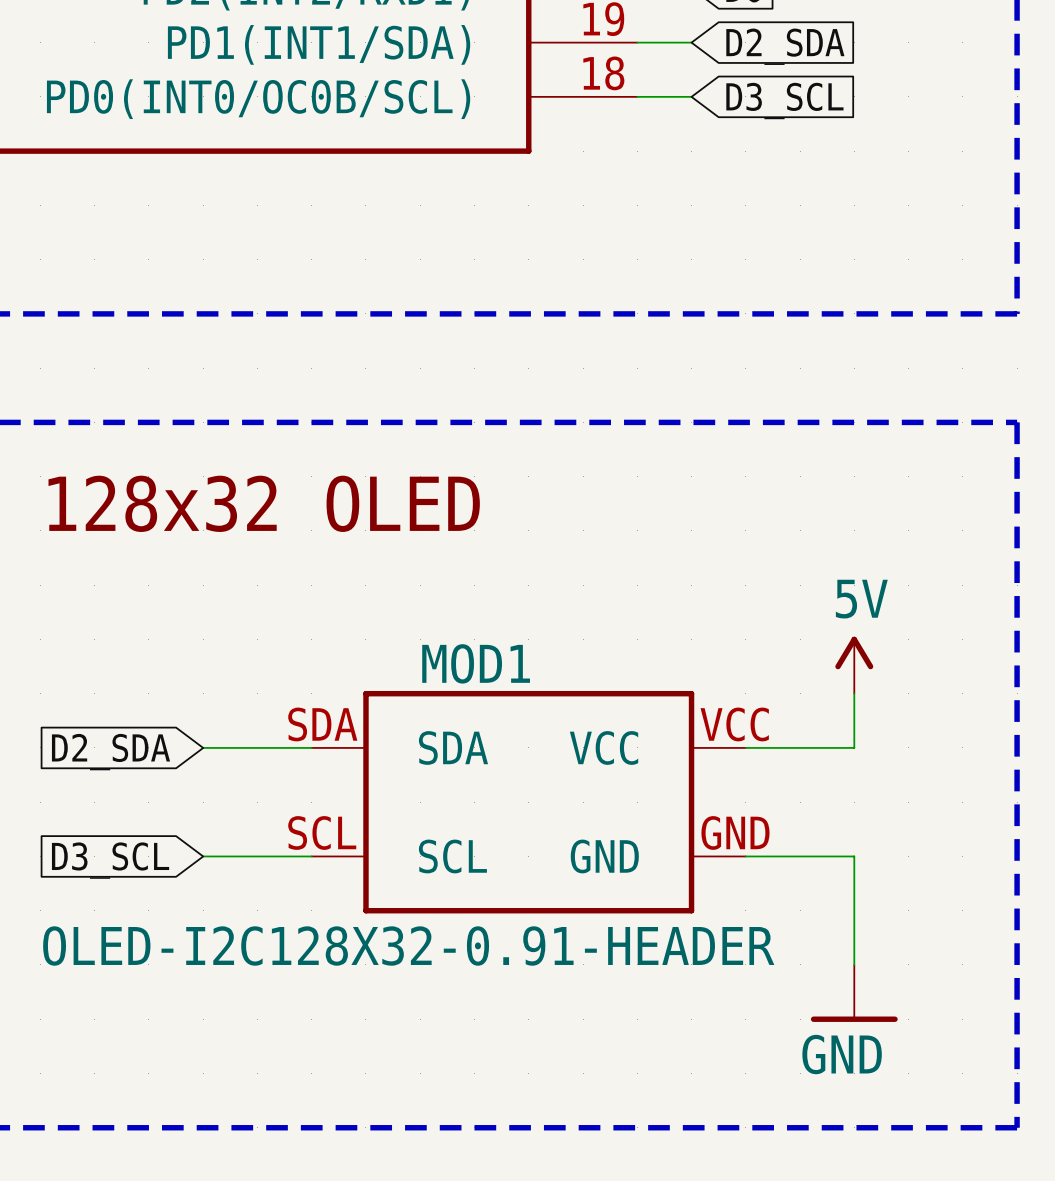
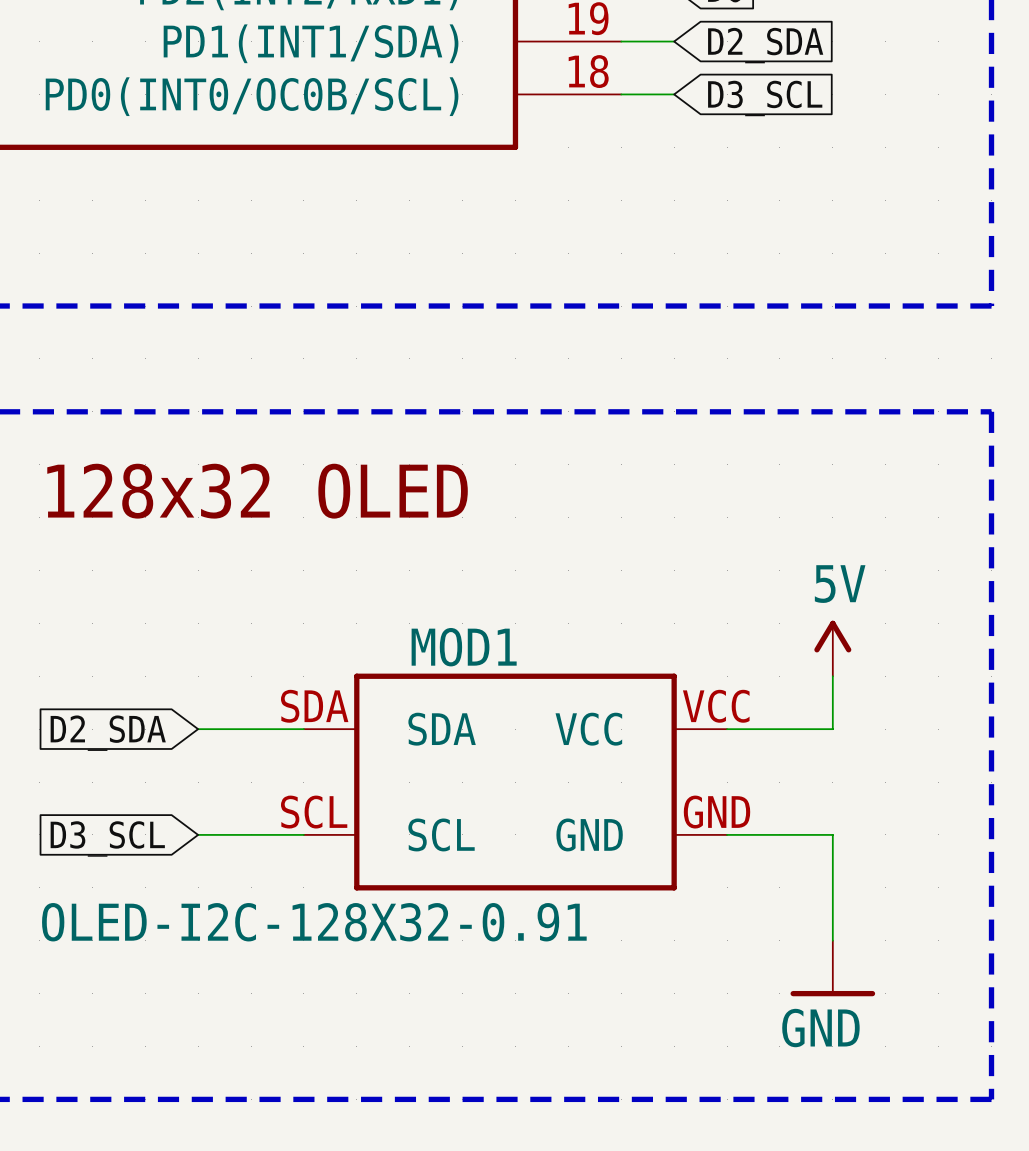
MOD1 value: OLED-I2C128X32-0.91-HEADER (408, 946) -> OLED-I2C-128X32-0.91 (314, 922)

